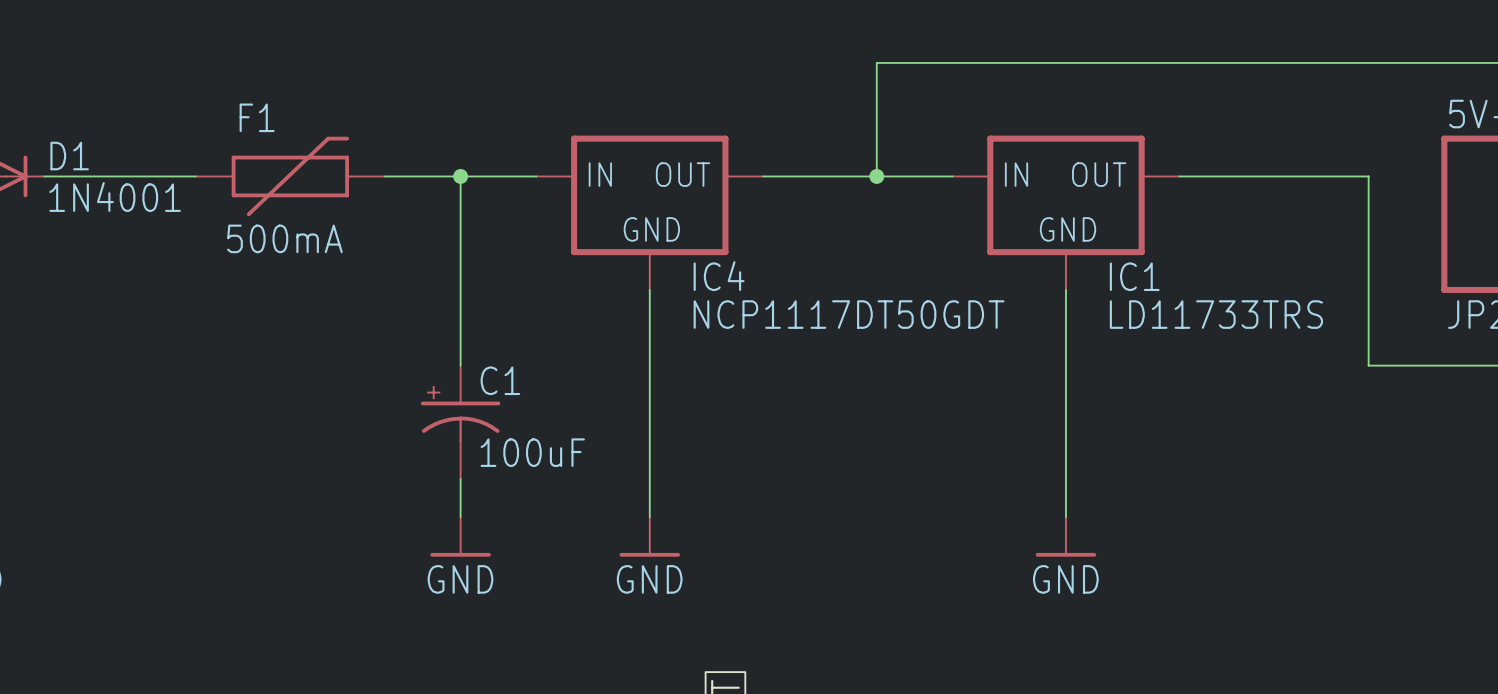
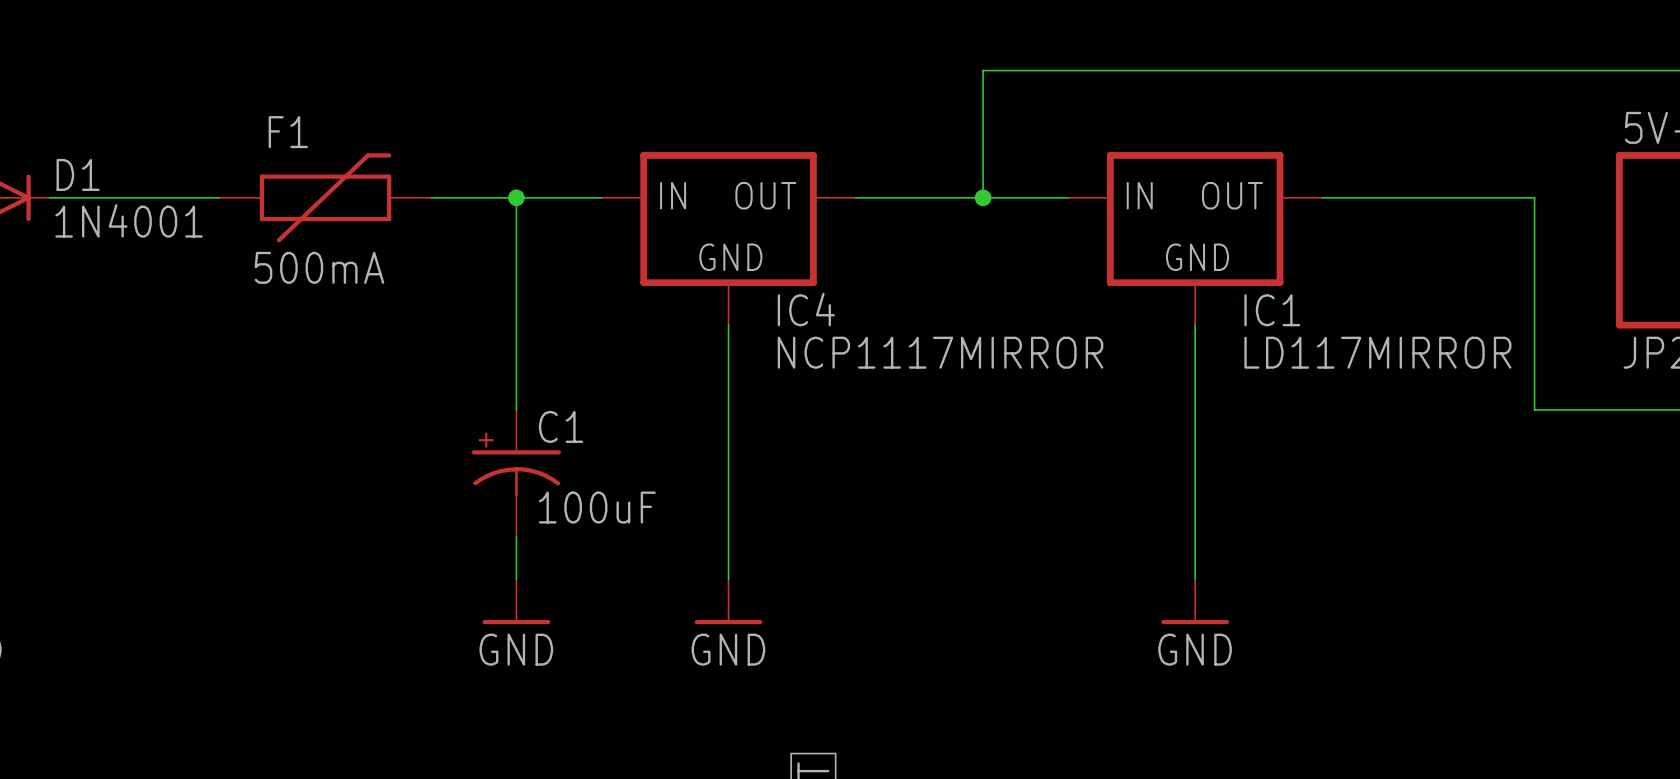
IC4 value: NCP1117DT50GDT (849, 314) -> NCP1117MIRROR (940, 352)
IC1 value: LD11733TRS (1216, 314) -> LD117MIRROR (1377, 352)

